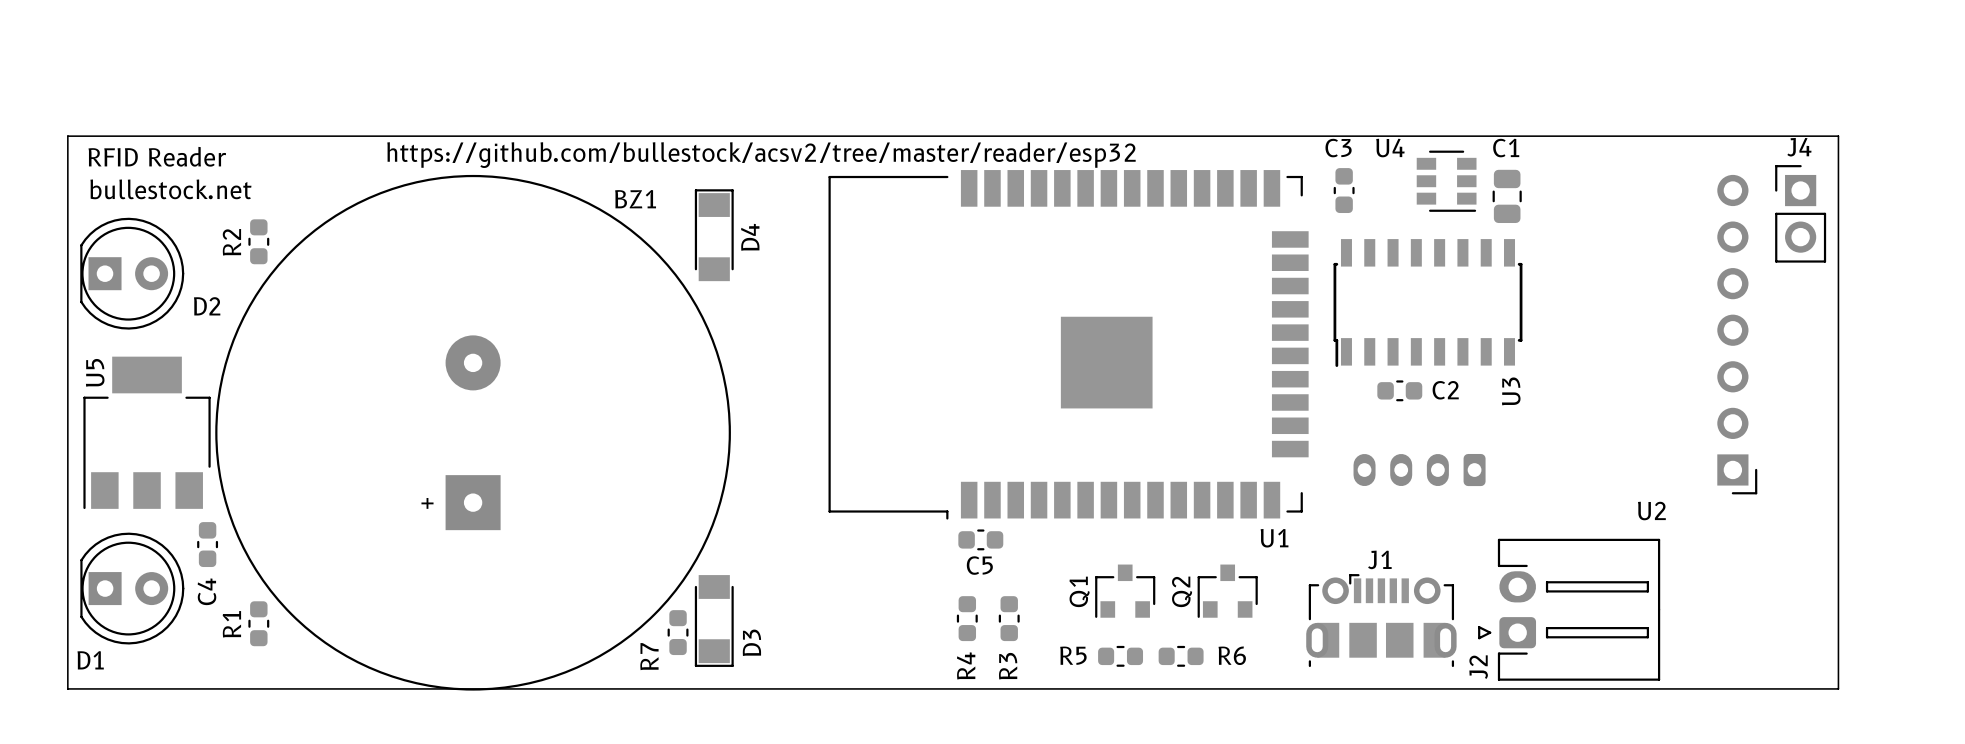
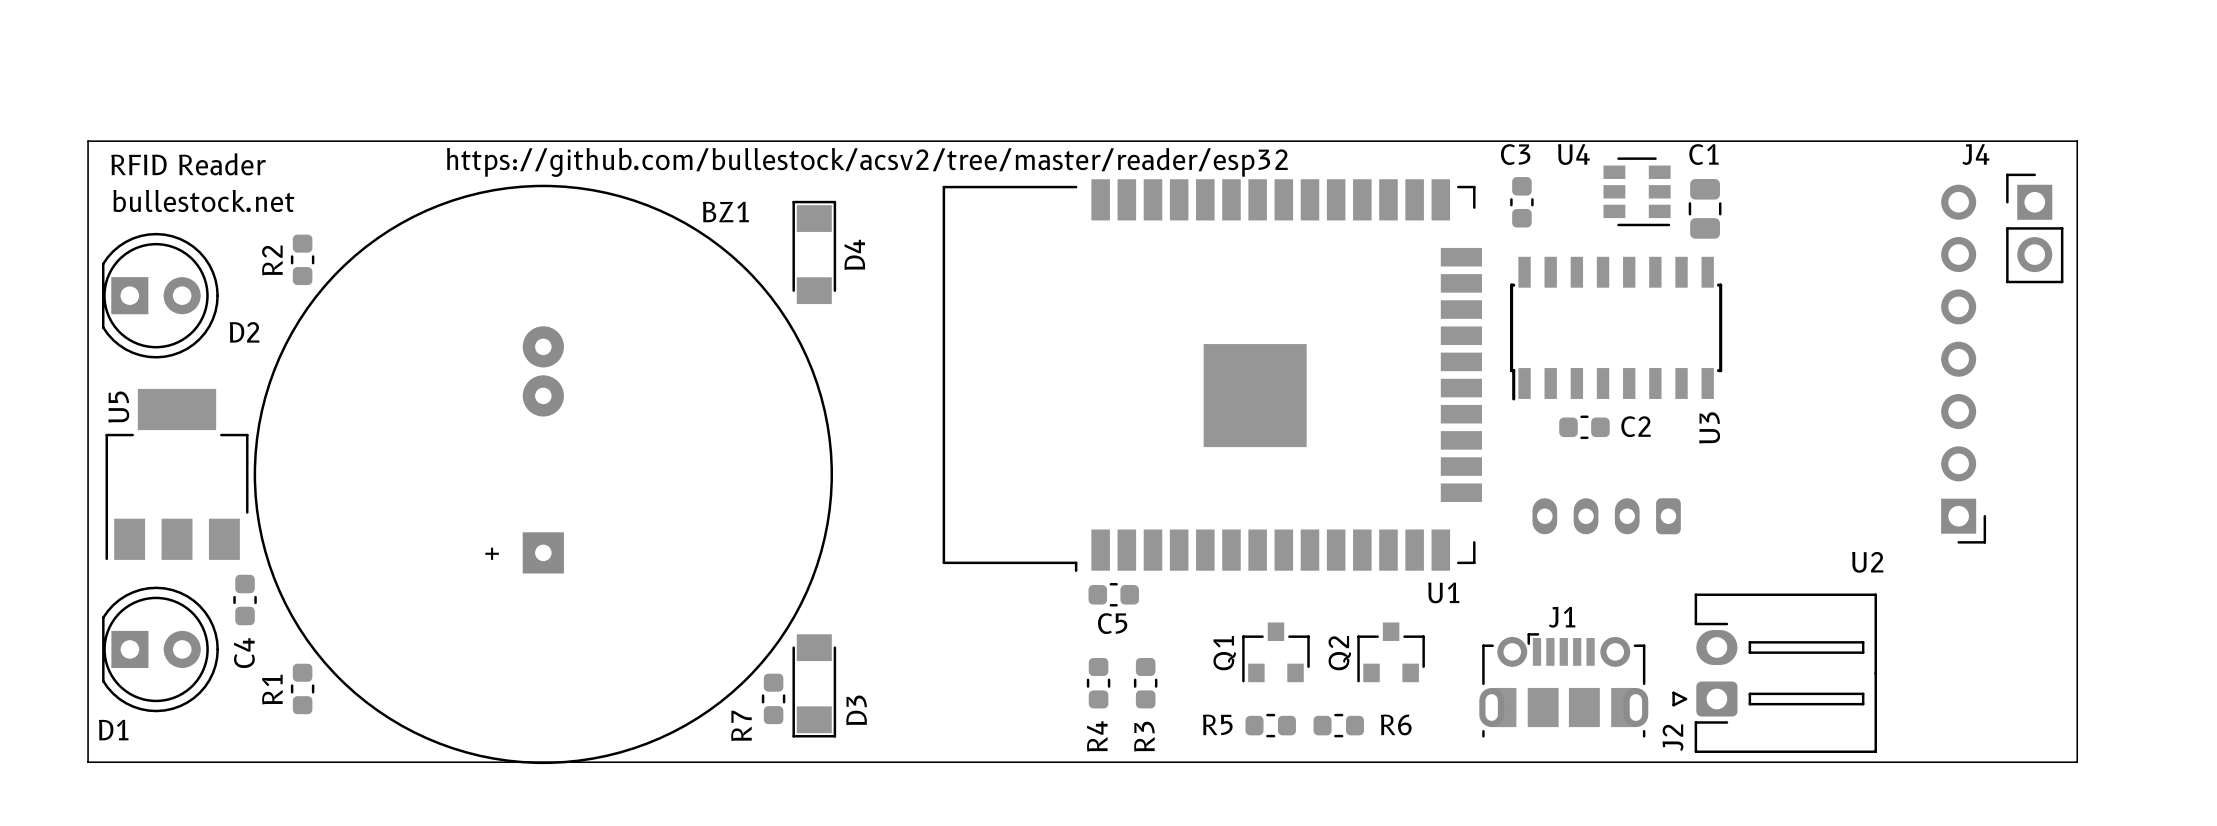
J4 name position: J4 (1799, 147) -> J4 (1975, 154)
BZ1 footprint: [215, 174, 731, 691] -> [253, 184, 834, 765]

